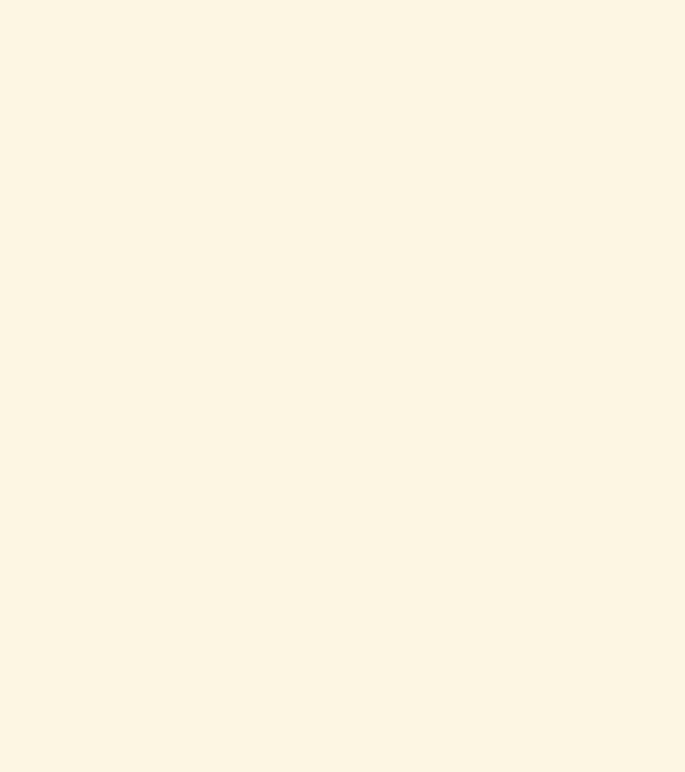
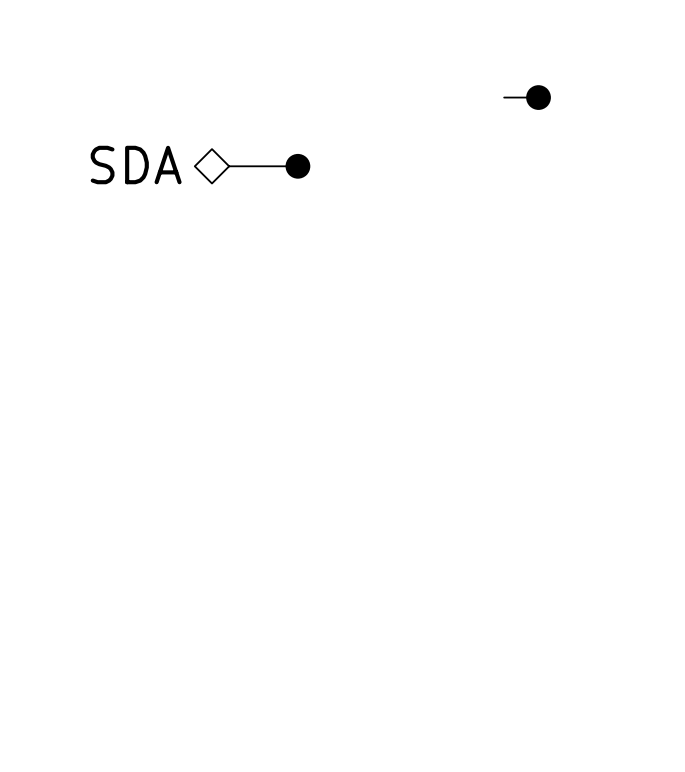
wire: none -> (504, 97) (538, 97)
junction: none -> (538, 97)
hierarchical label: none -> SDA (136, 165)
wire: none -> (229, 166) (297, 166)
junction: none -> (297, 166)

